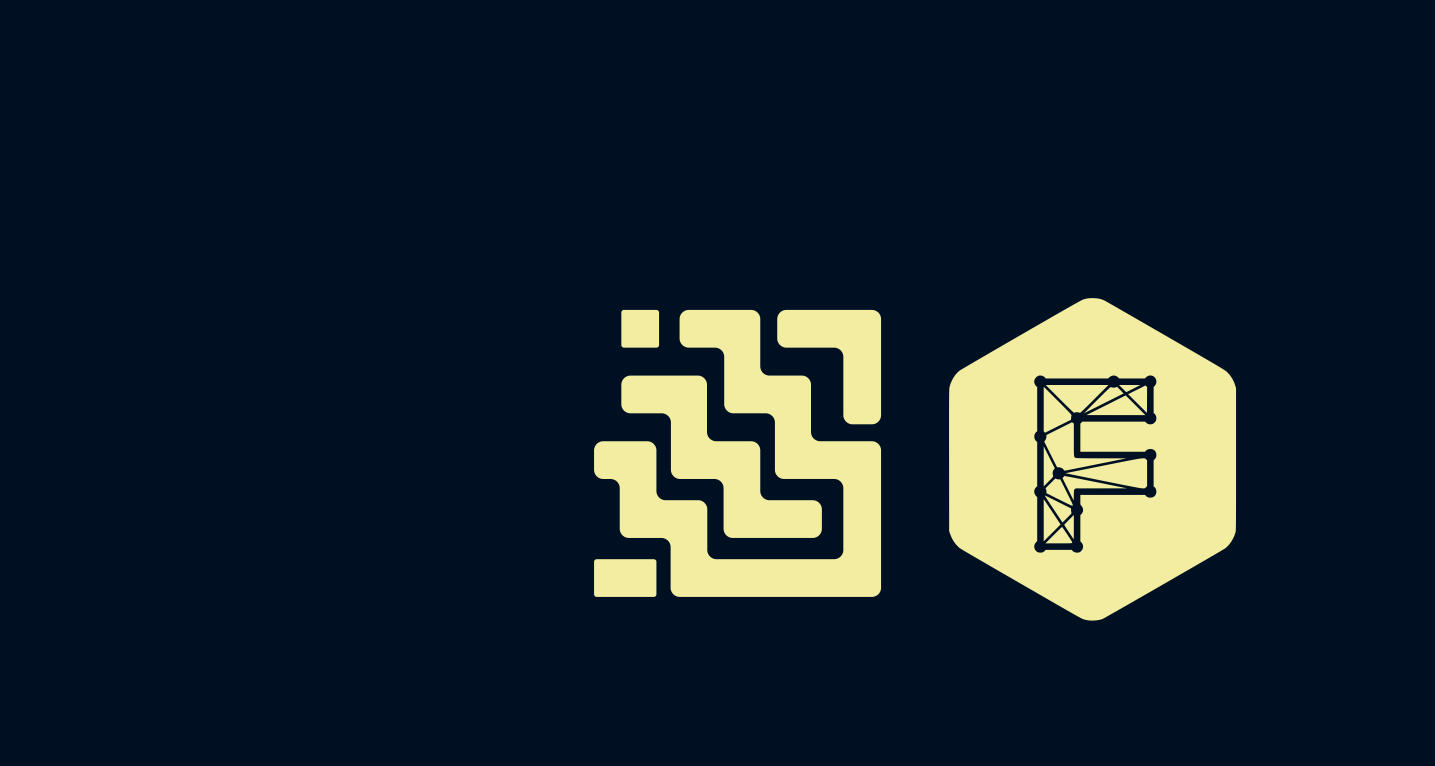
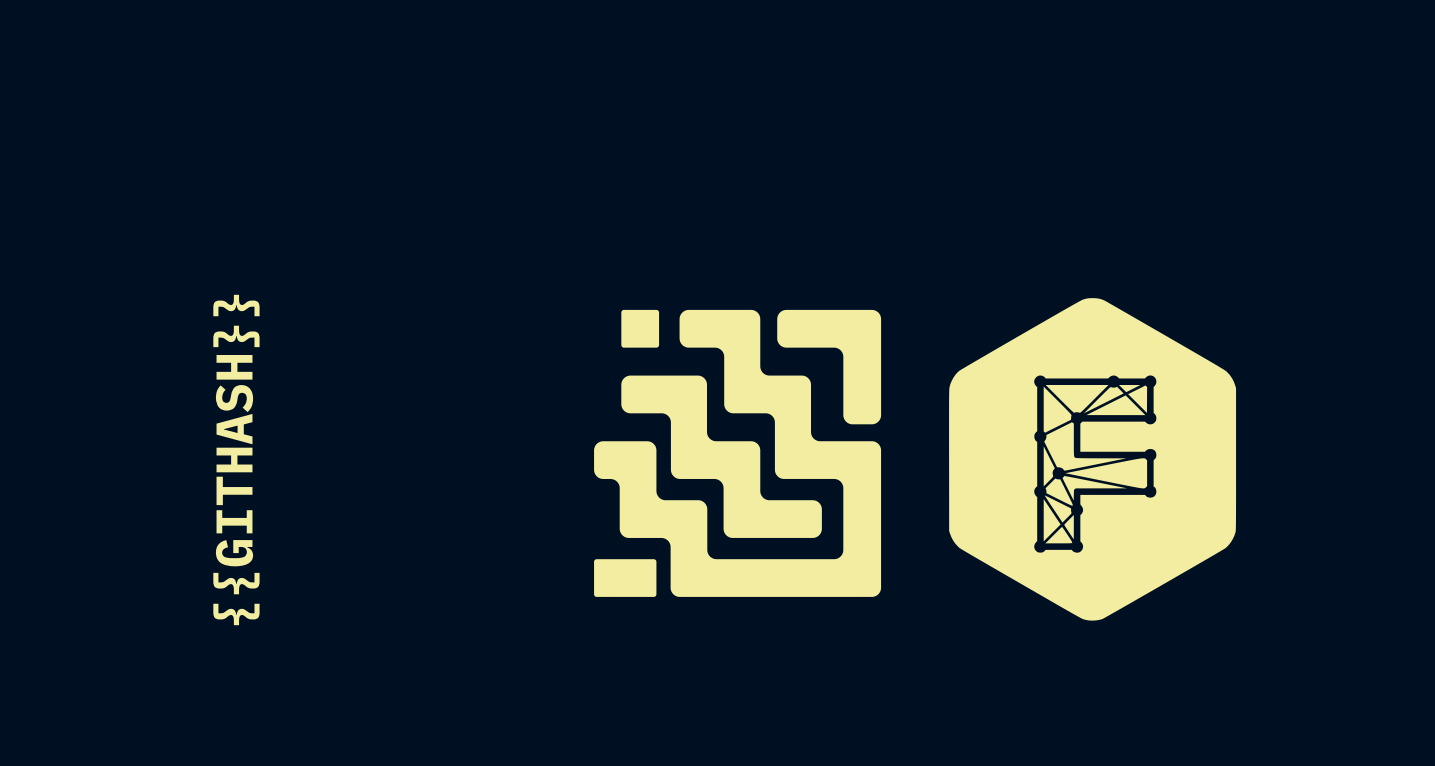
text: none -> {{GITHASH}} (236, 460)

